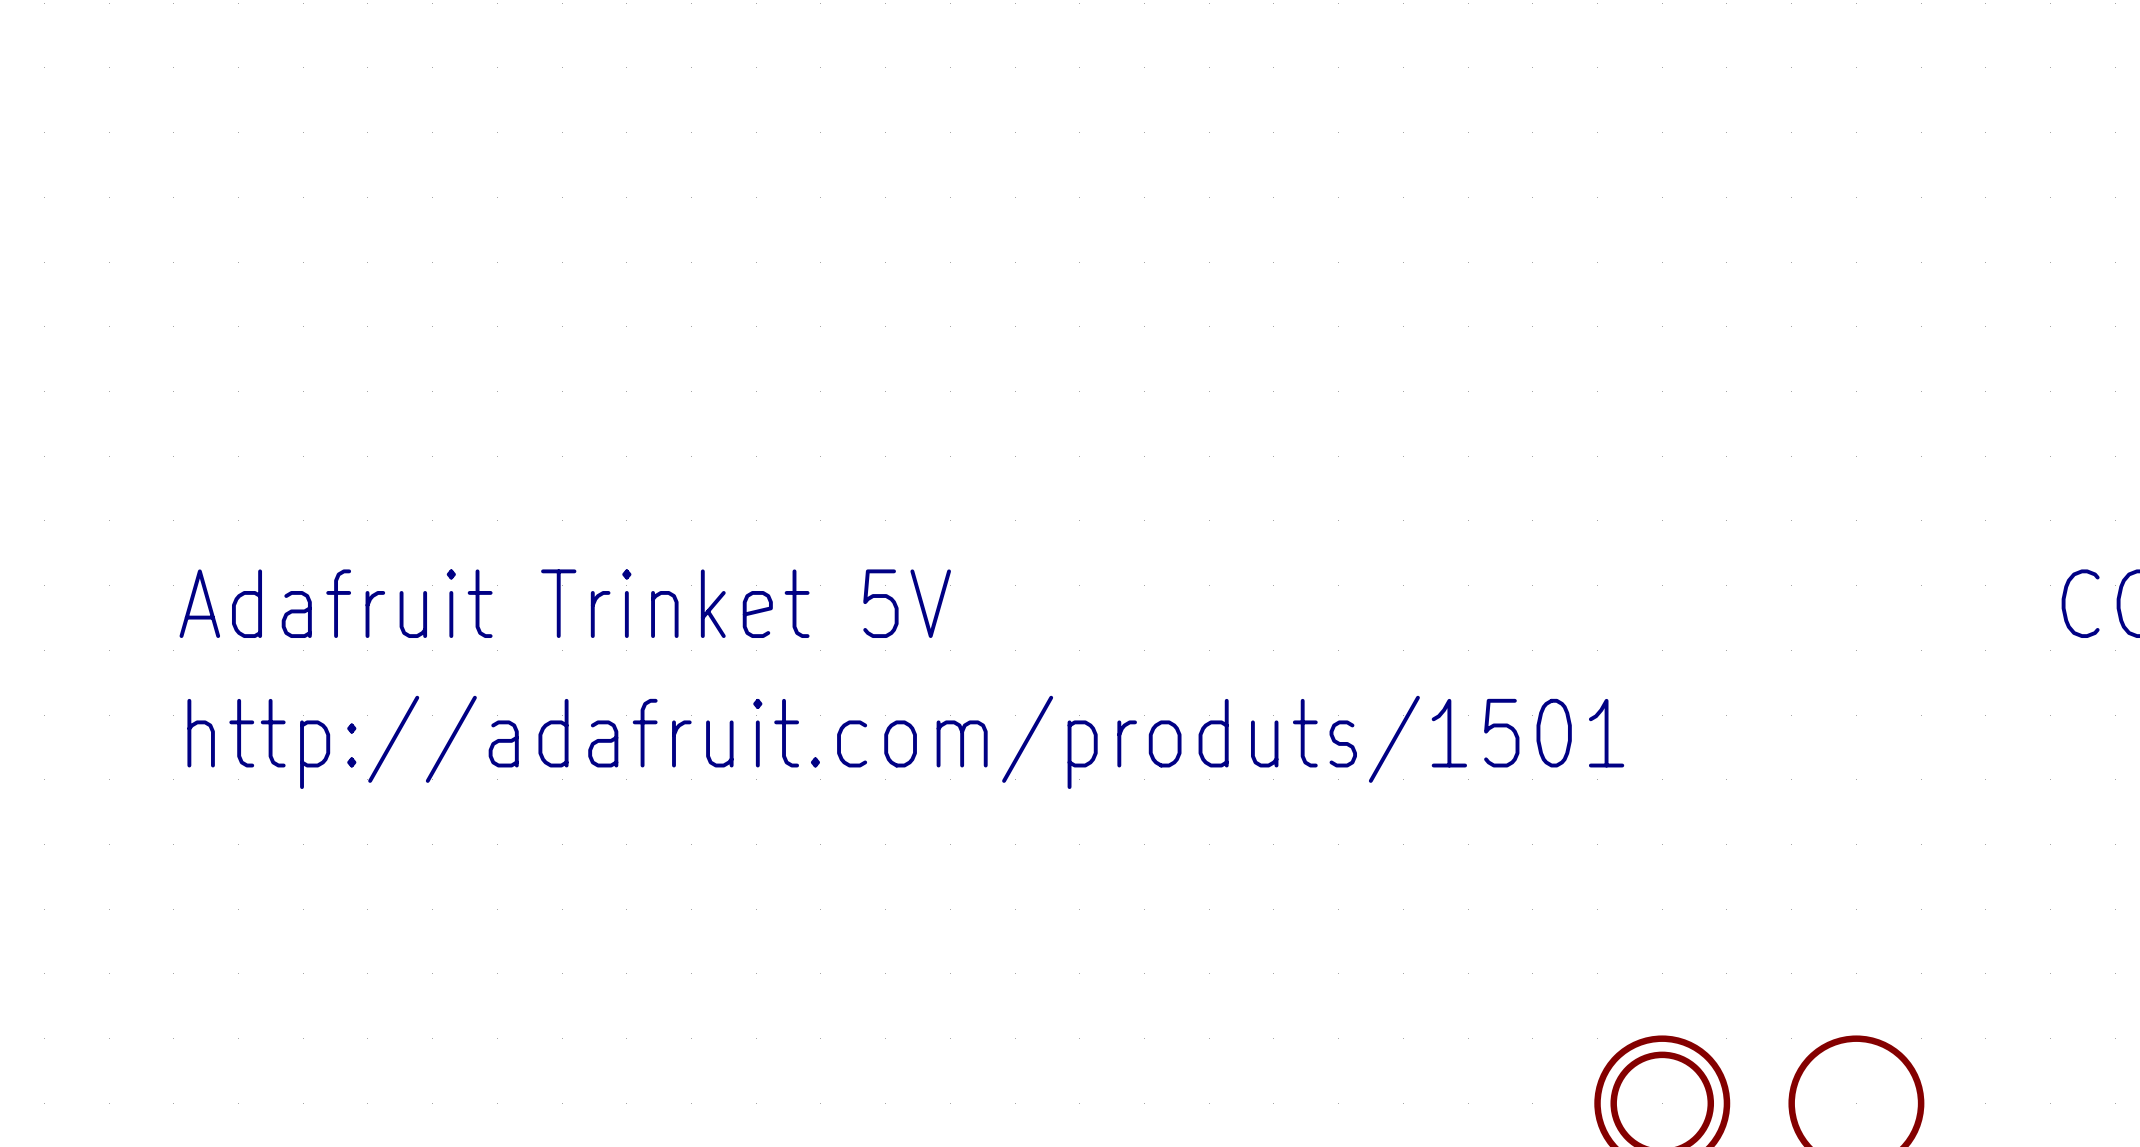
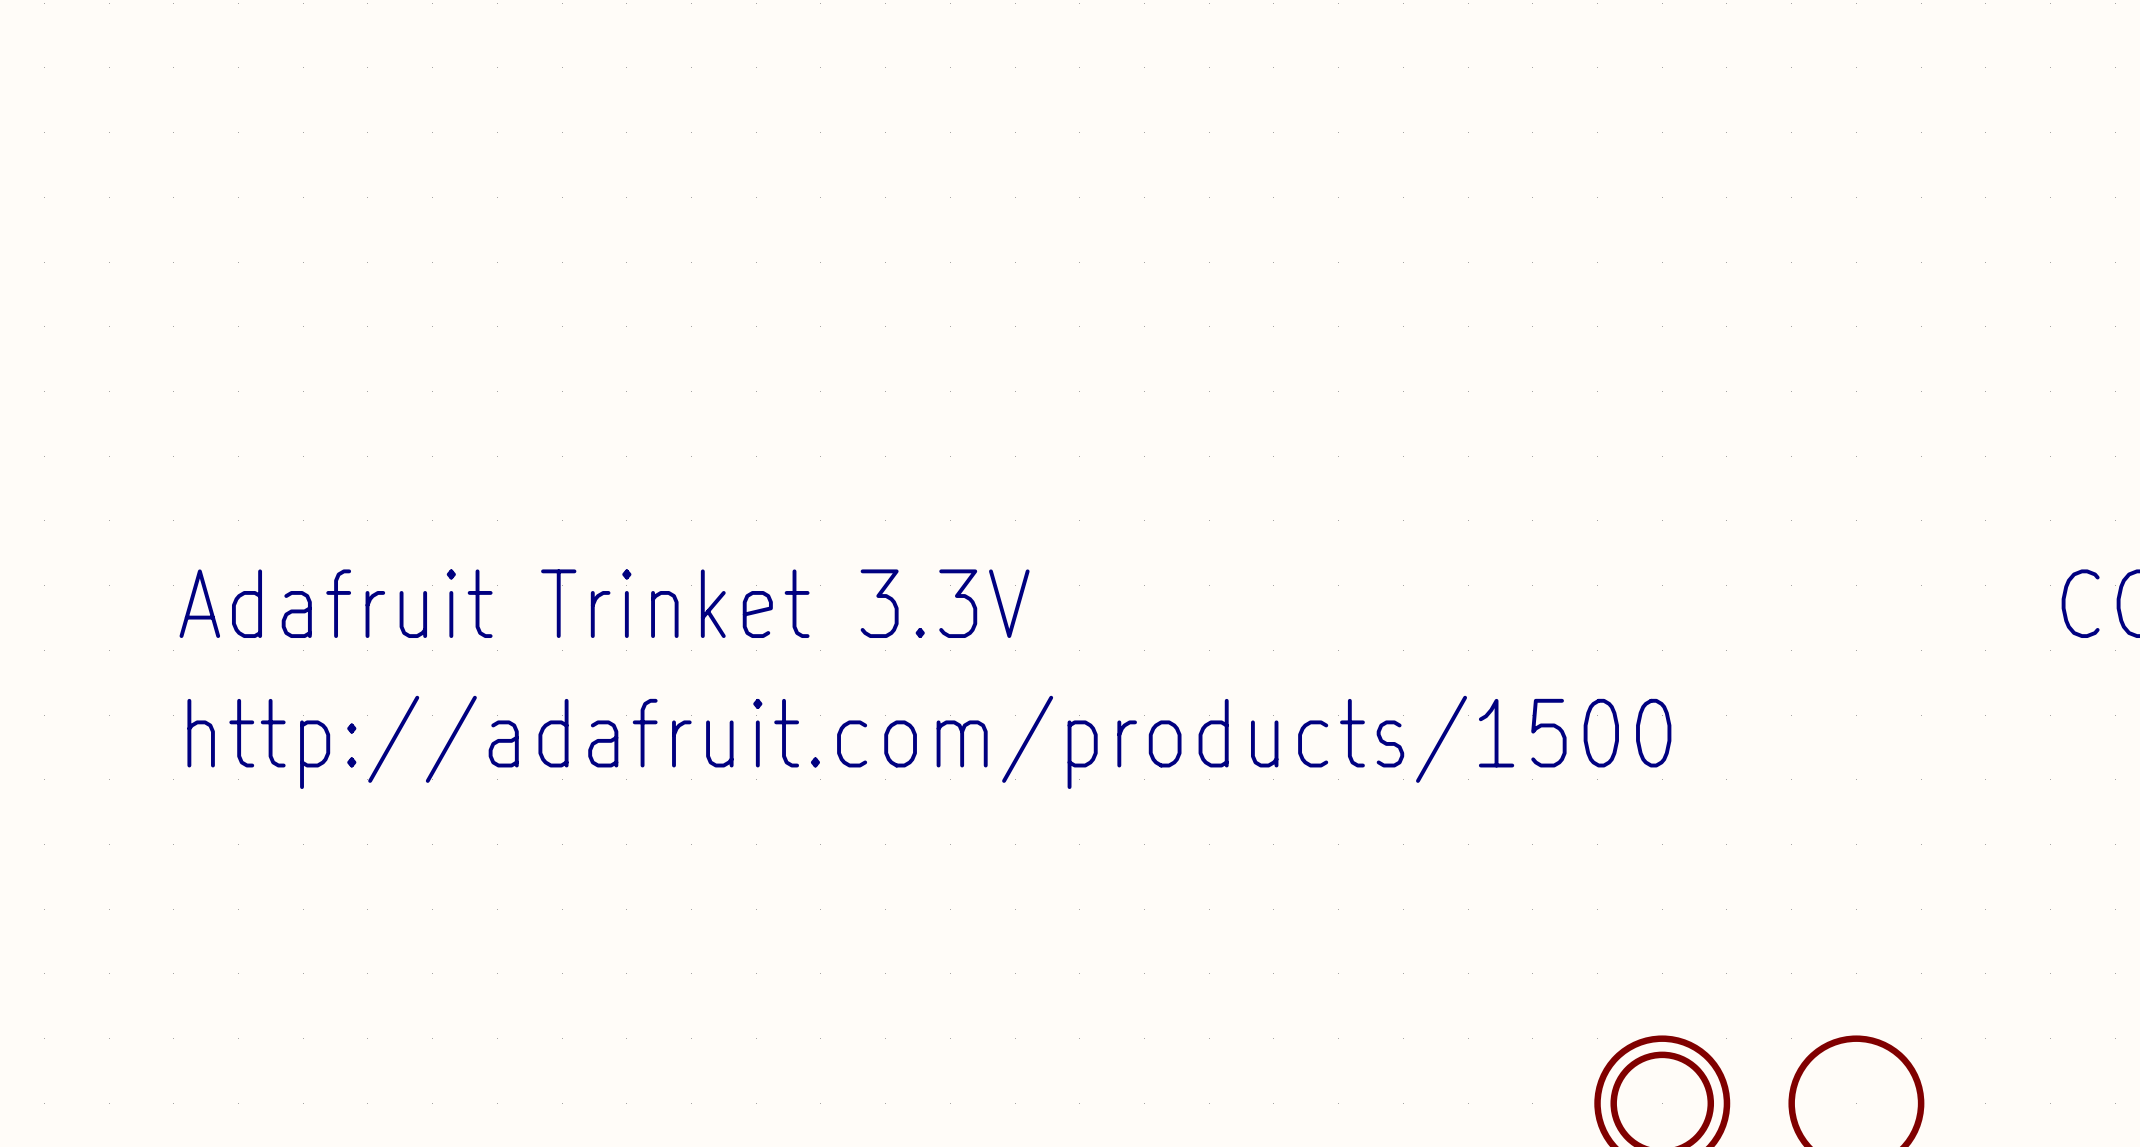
text: Adafruit Trinket 5V (565, 603) -> Adafruit Trinket 3.3V (604, 603)
text: http://adafruit.com/produts/1501 (905, 742) -> http://adafruit.com/products/1500 (929, 742)

